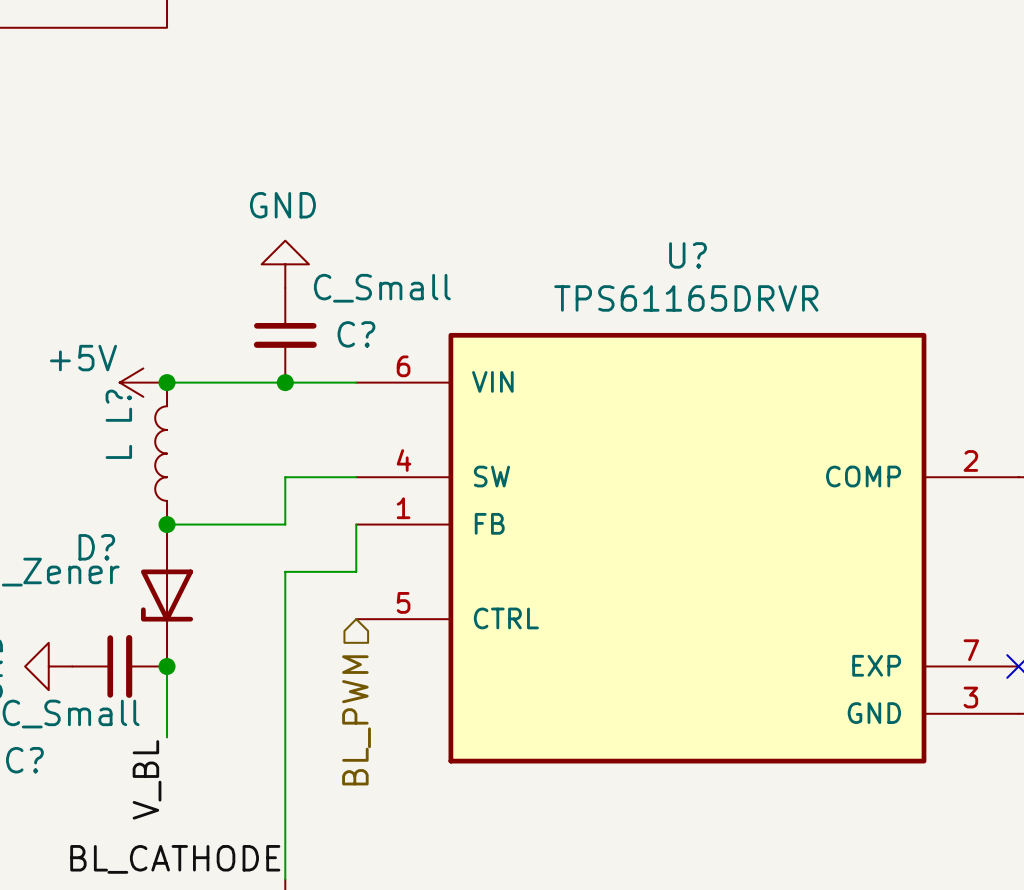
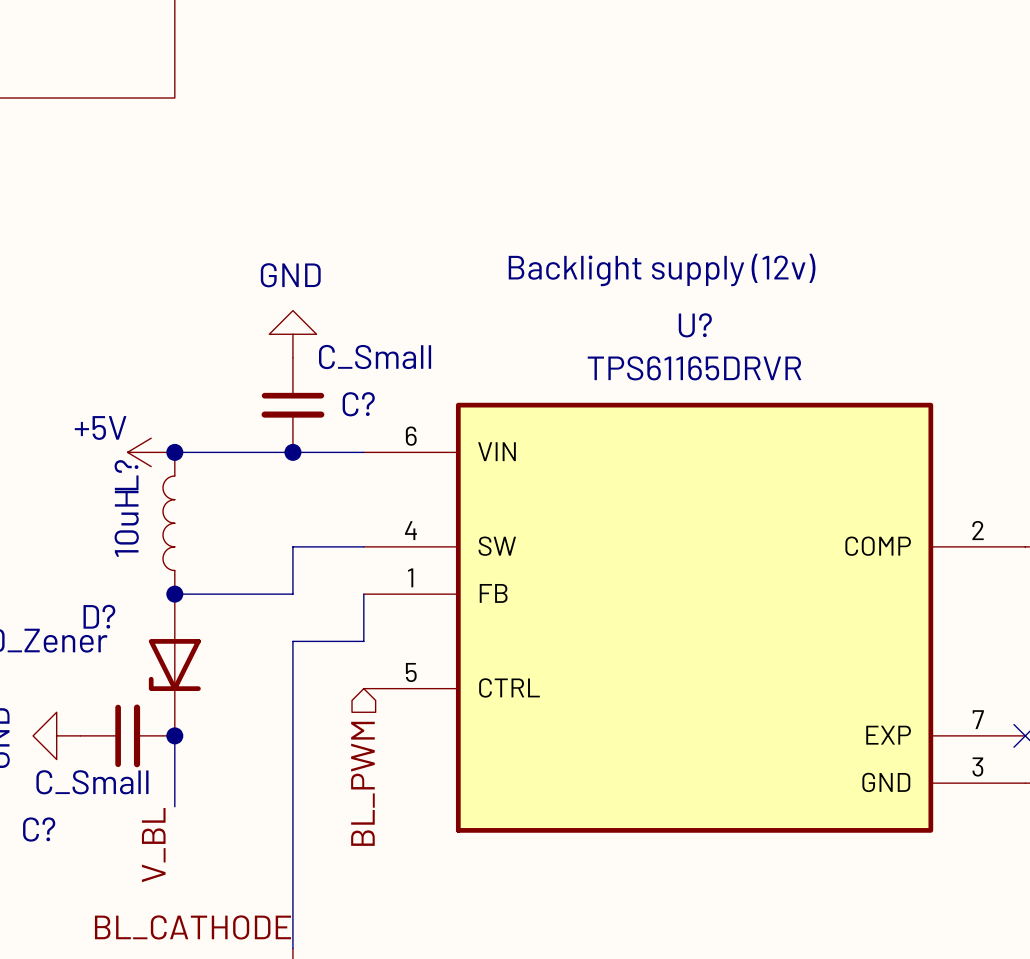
text: none -> Backlight supply (12v) (662, 269)
L? value: L (118, 451) -> 10uH (126, 523)

